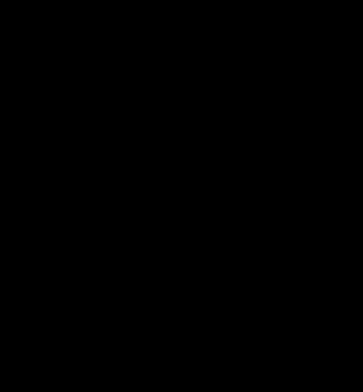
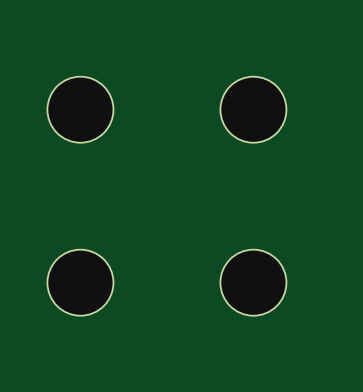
part: none -> (80, 109)
part: none -> (253, 109)
part: none -> (80, 282)
part: none -> (253, 282)

